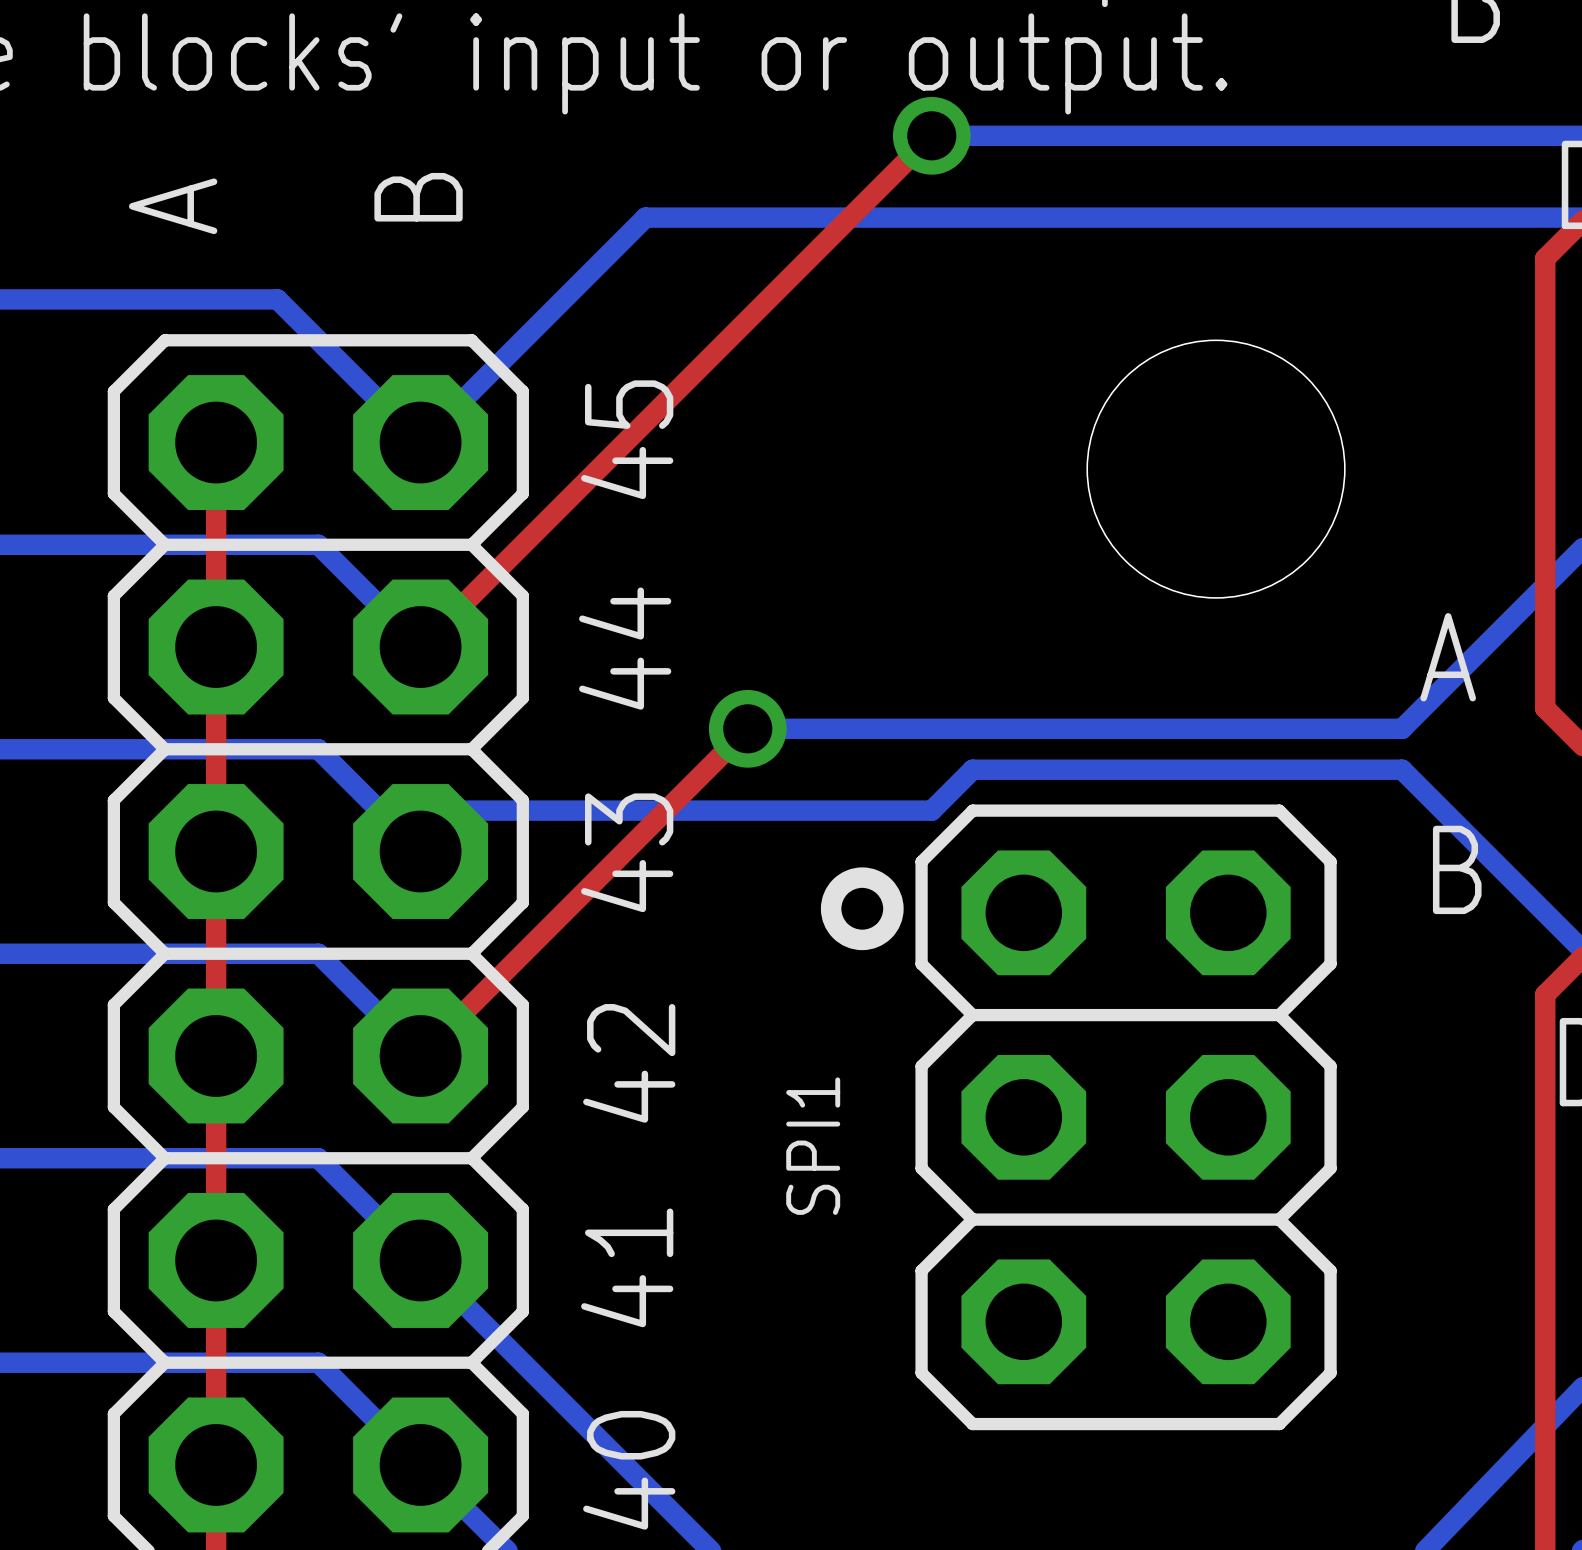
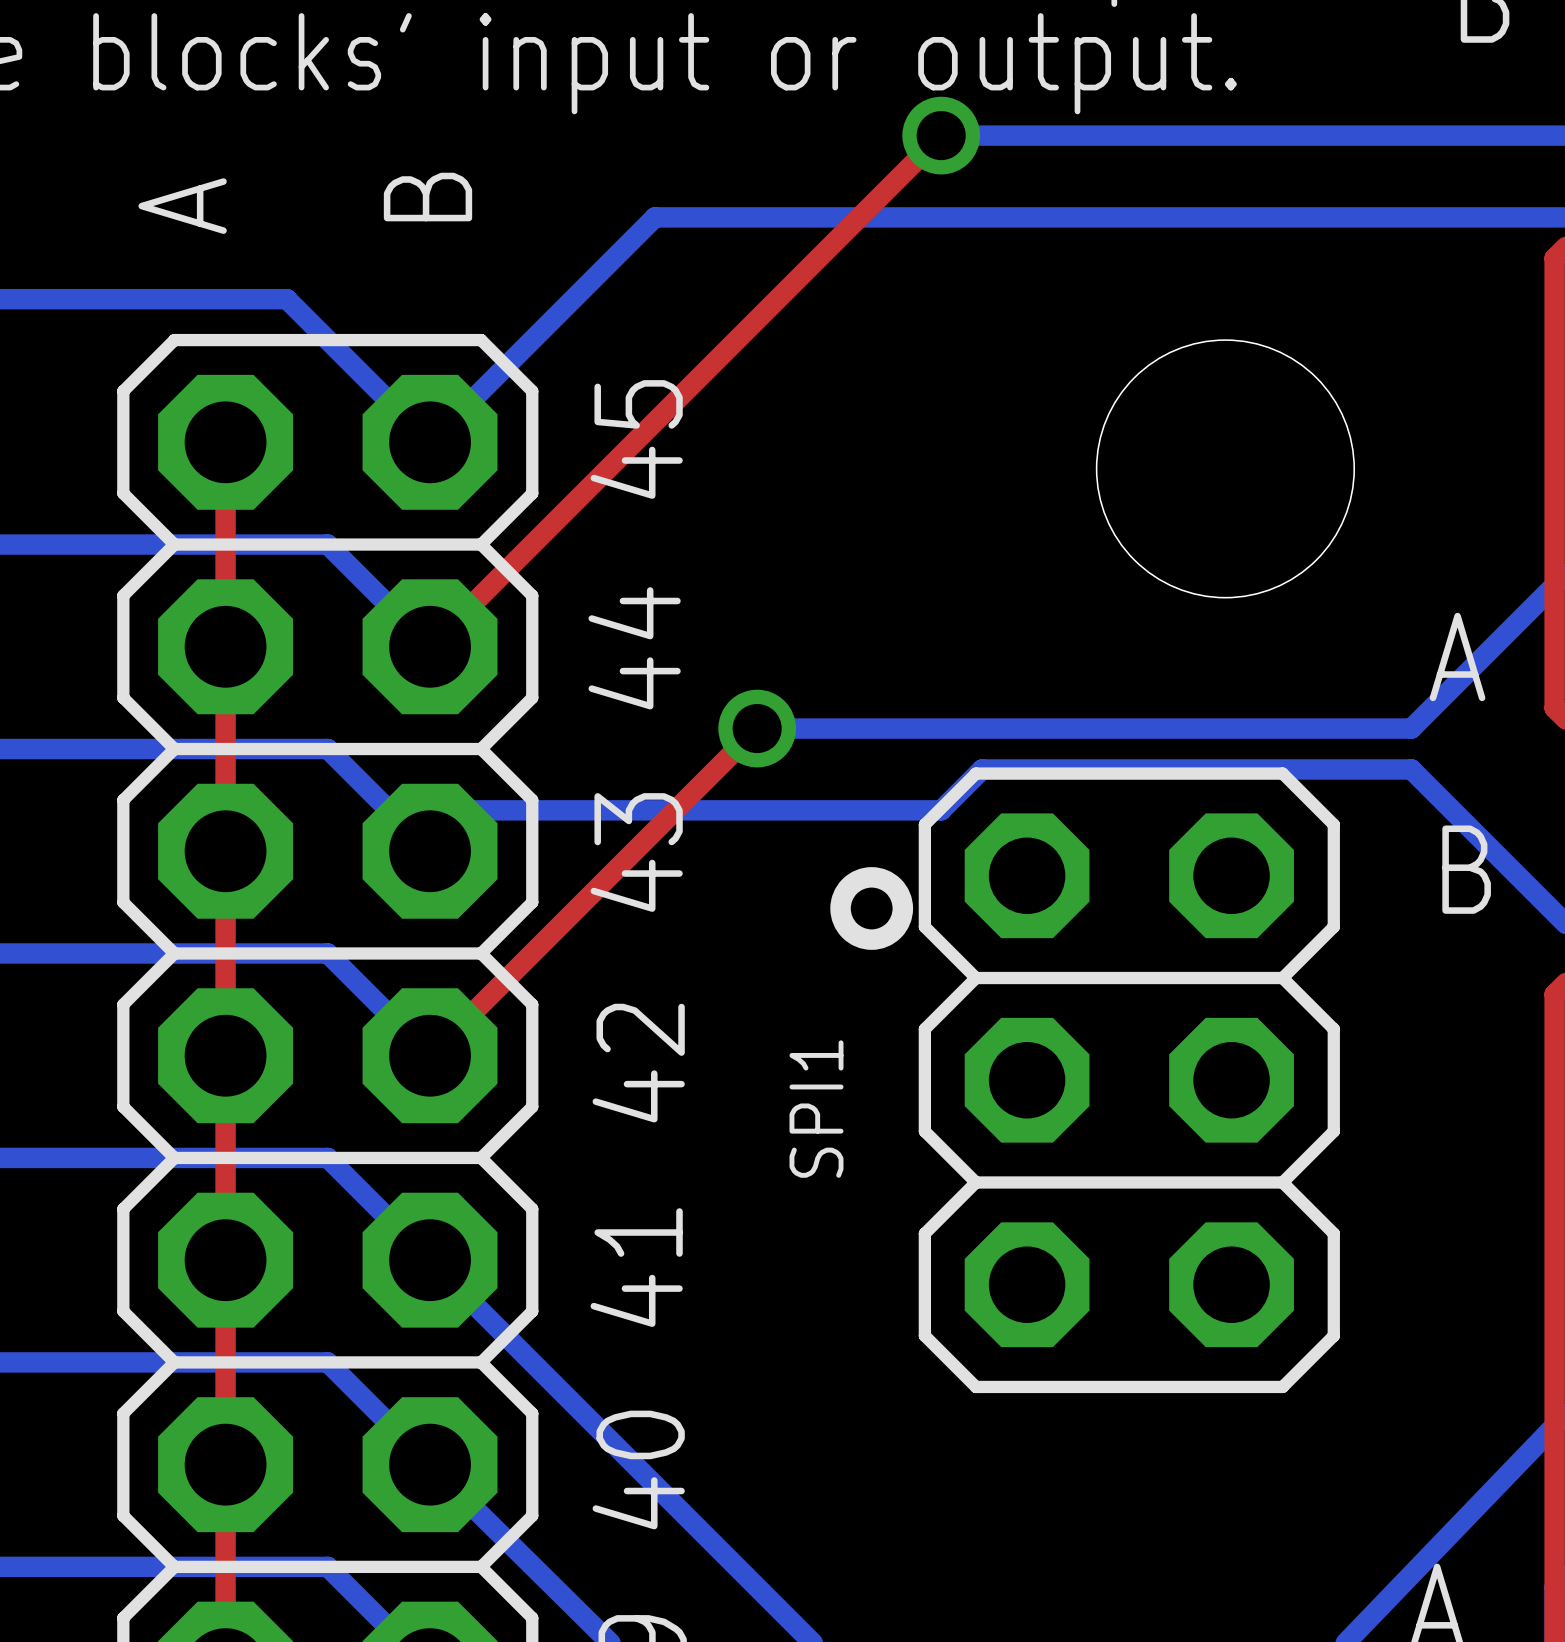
SPI1 position: (1126, 1117) -> (1129, 1080)

